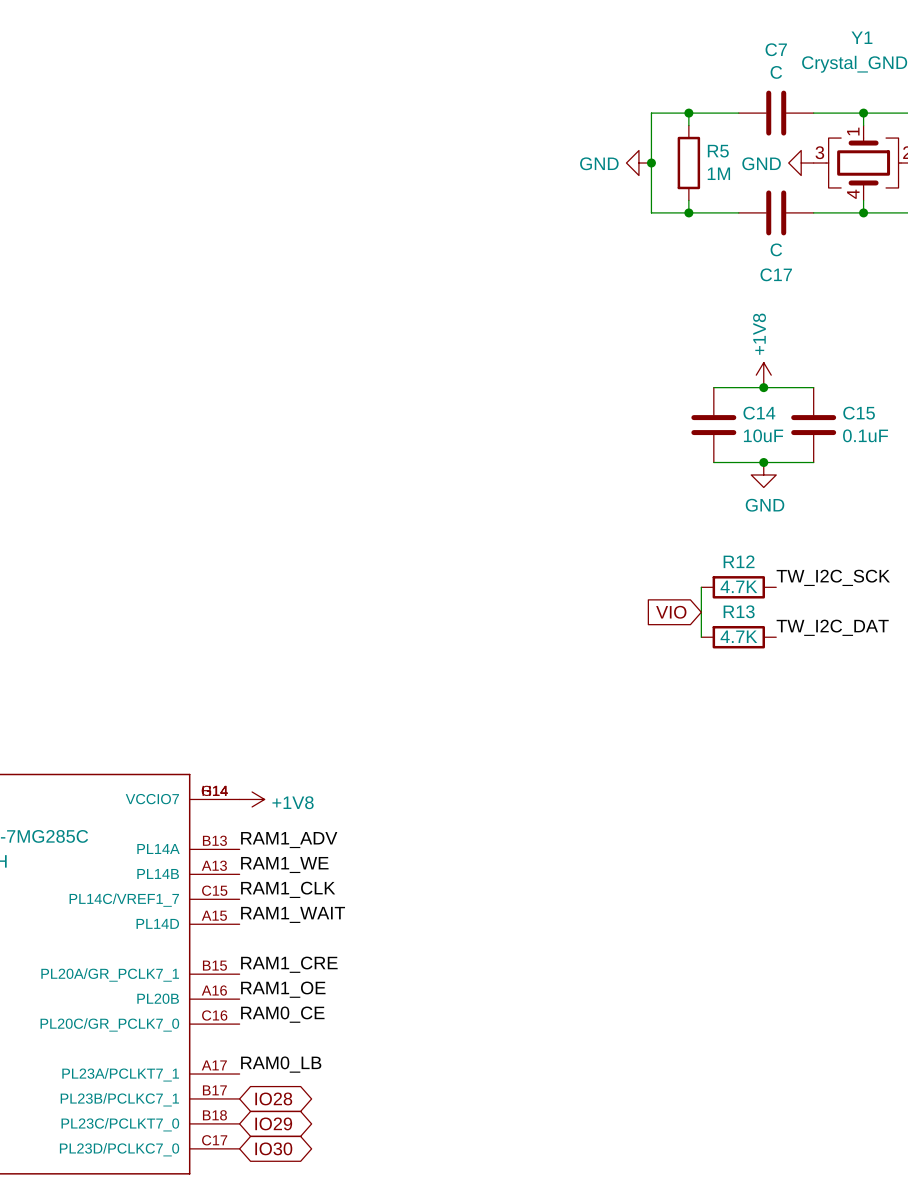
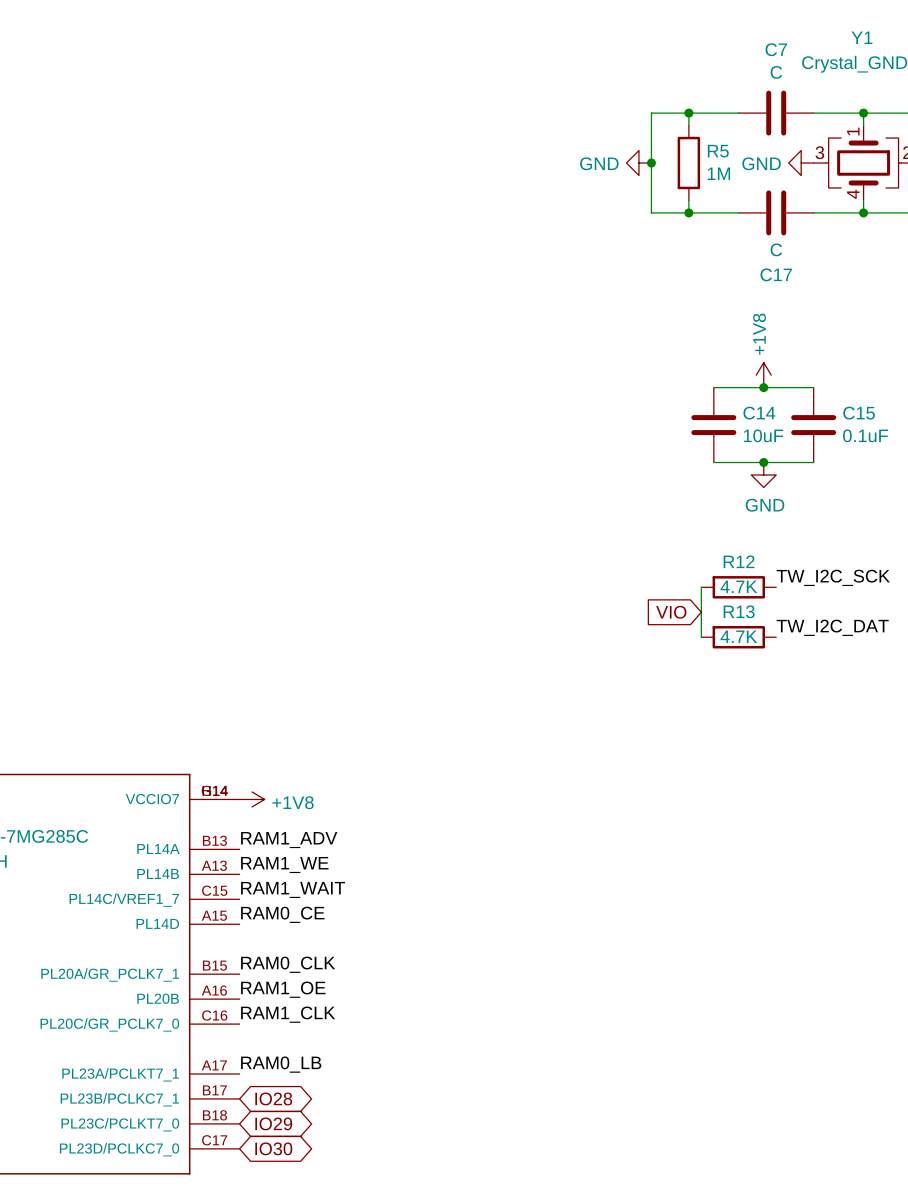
label: RAM1_CLK (288, 889) -> RAM1_WAIT (293, 889)
label: RAM1_WAIT (293, 914) -> RAM0_CE (282, 914)
label: RAM1_CRE (289, 964) -> RAM0_CLK (288, 964)
label: RAM0_CE (282, 1014) -> RAM1_CLK (288, 1014)

